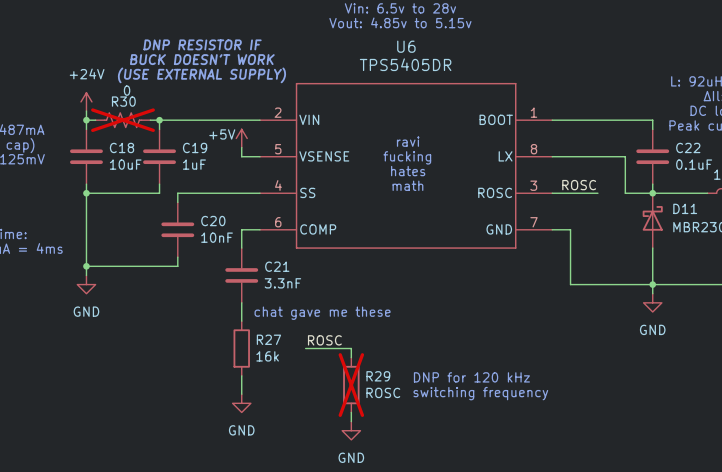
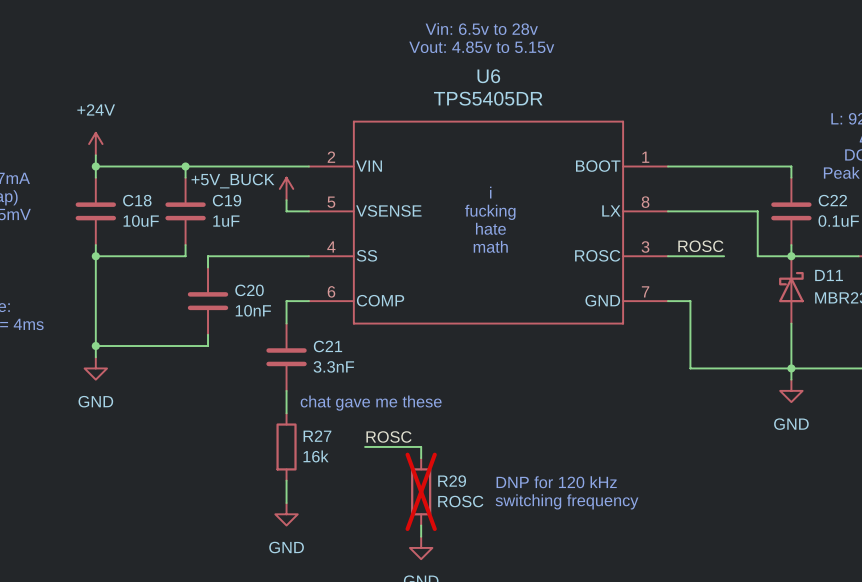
text: DNP RESISTOR IF (202, 44) -> none
text: BUCK DOESN'T WORK (202, 59) -> none
text: (USE EXTERNAL SUPPLY) (201, 75) -> none
R30: 0 (122, 120) -> none
power symbol: +5V (241, 138) -> +5V_BUCK (286, 188)
text: ravi (408, 141) -> i (490, 192)
text: hates (408, 171) -> hate (490, 228)

